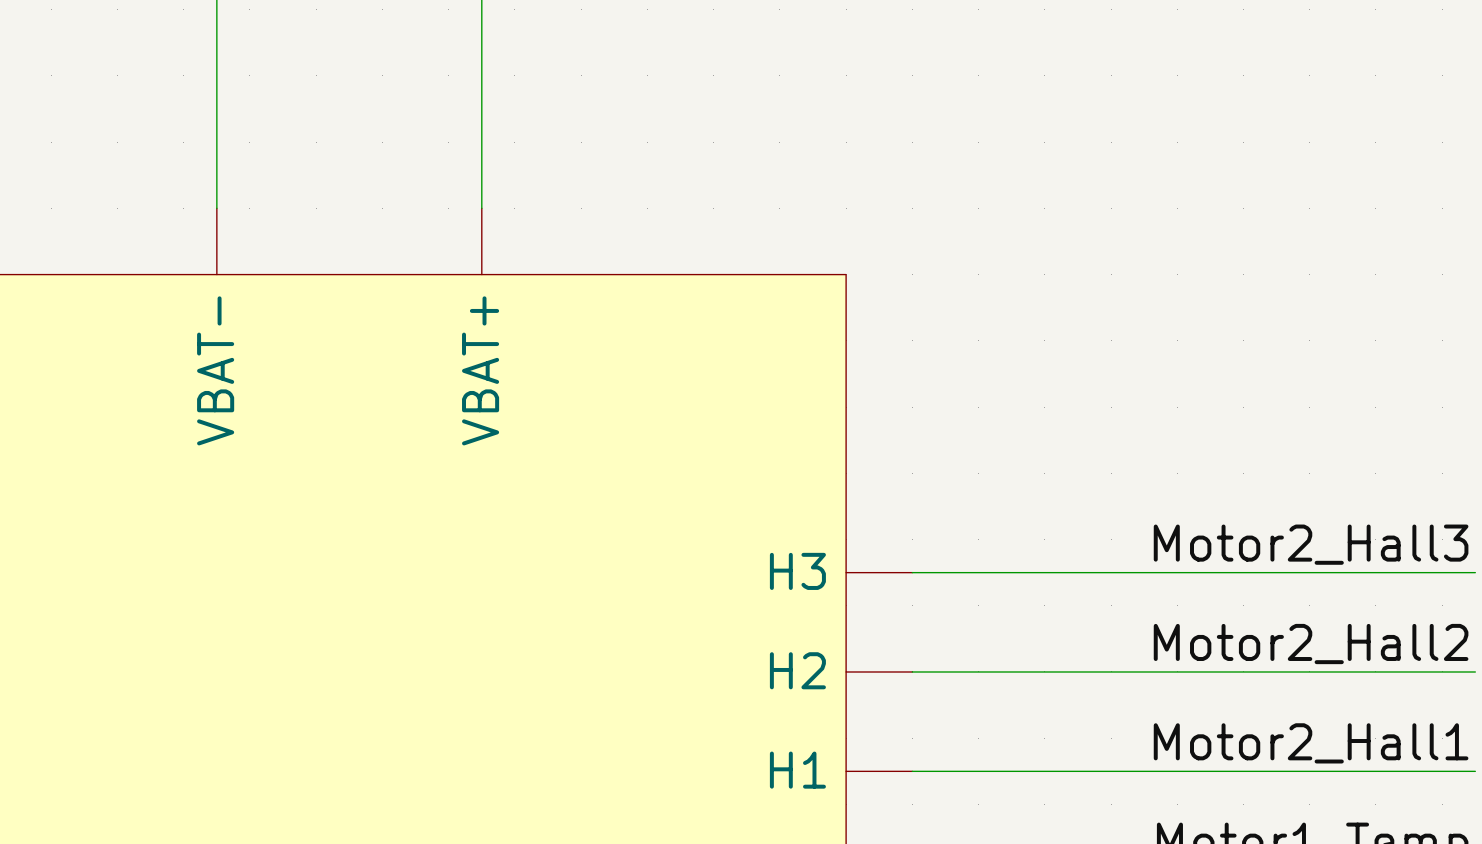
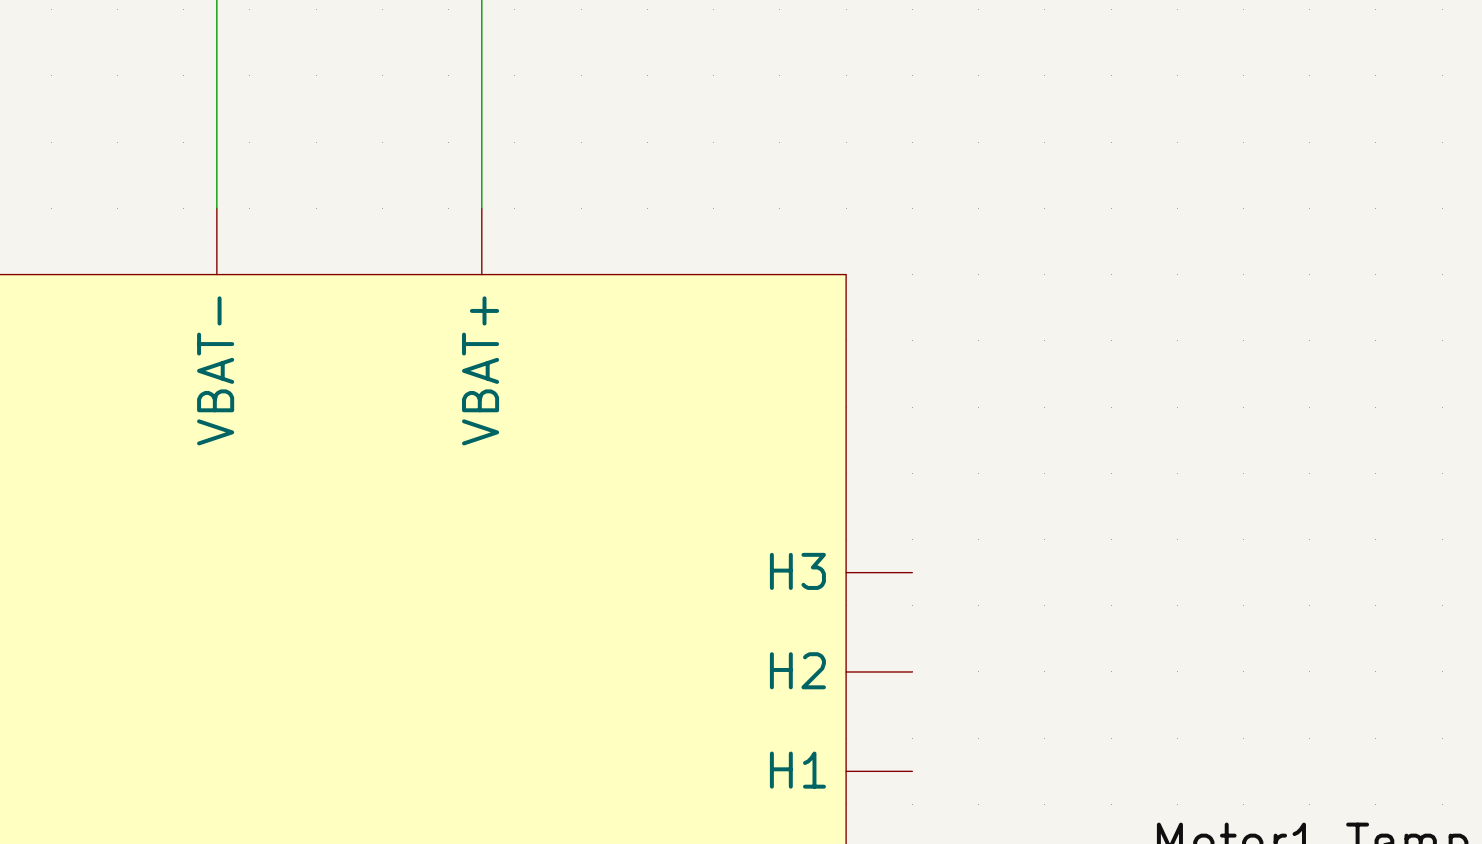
label: Motor2_Hall3 (1311, 544) -> none
wire: (912, 572) (1475, 572) -> none
label: Motor2_Hall2 (1311, 644) -> none
wire: (912, 671) (1475, 671) -> none
label: Motor2_Hall1 (1311, 743) -> none
wire: (912, 771) (1475, 771) -> none

